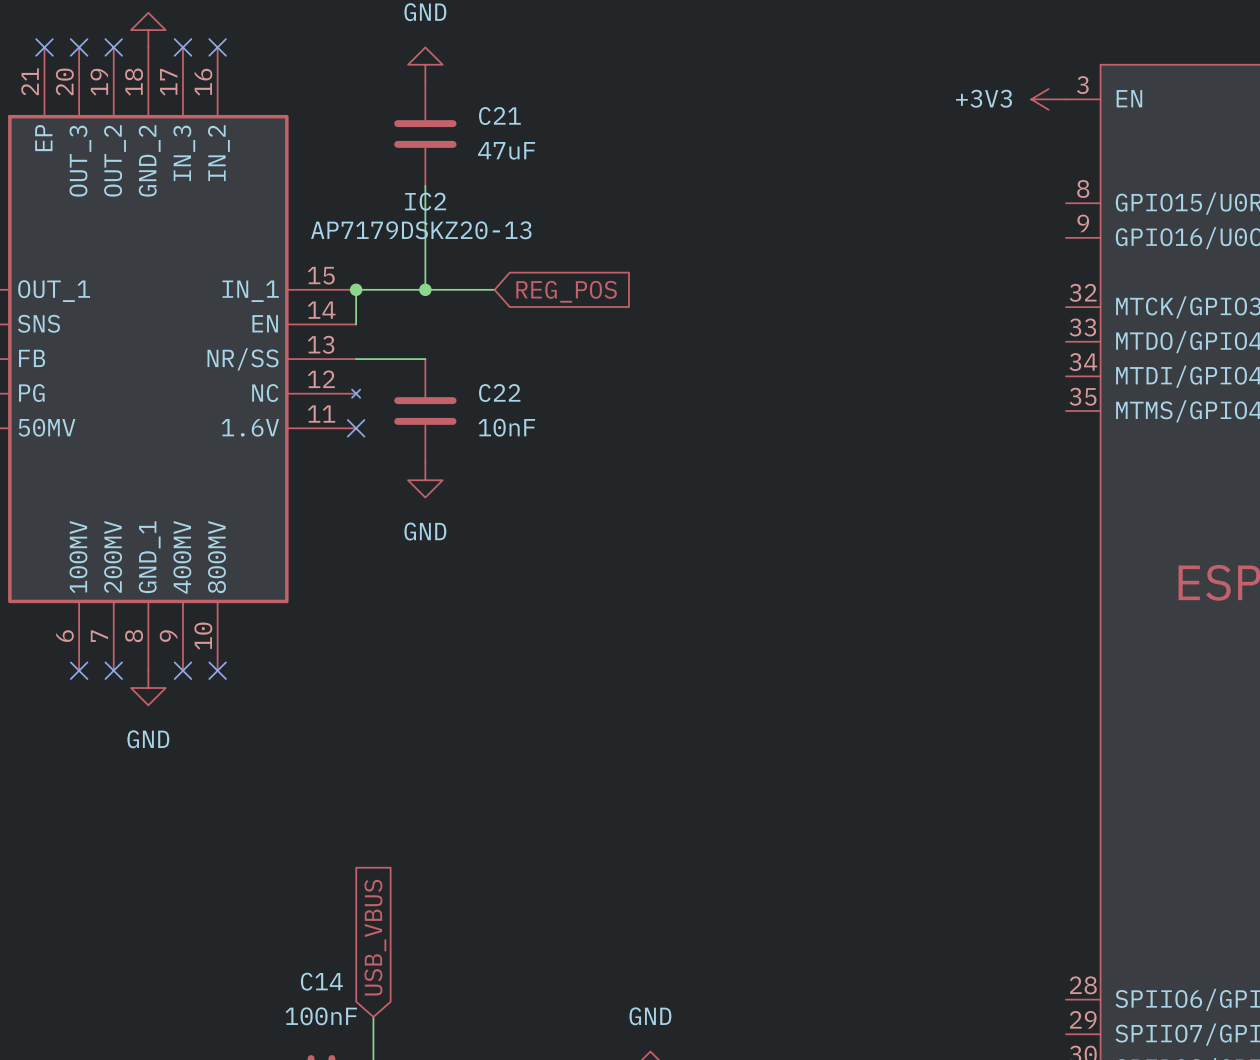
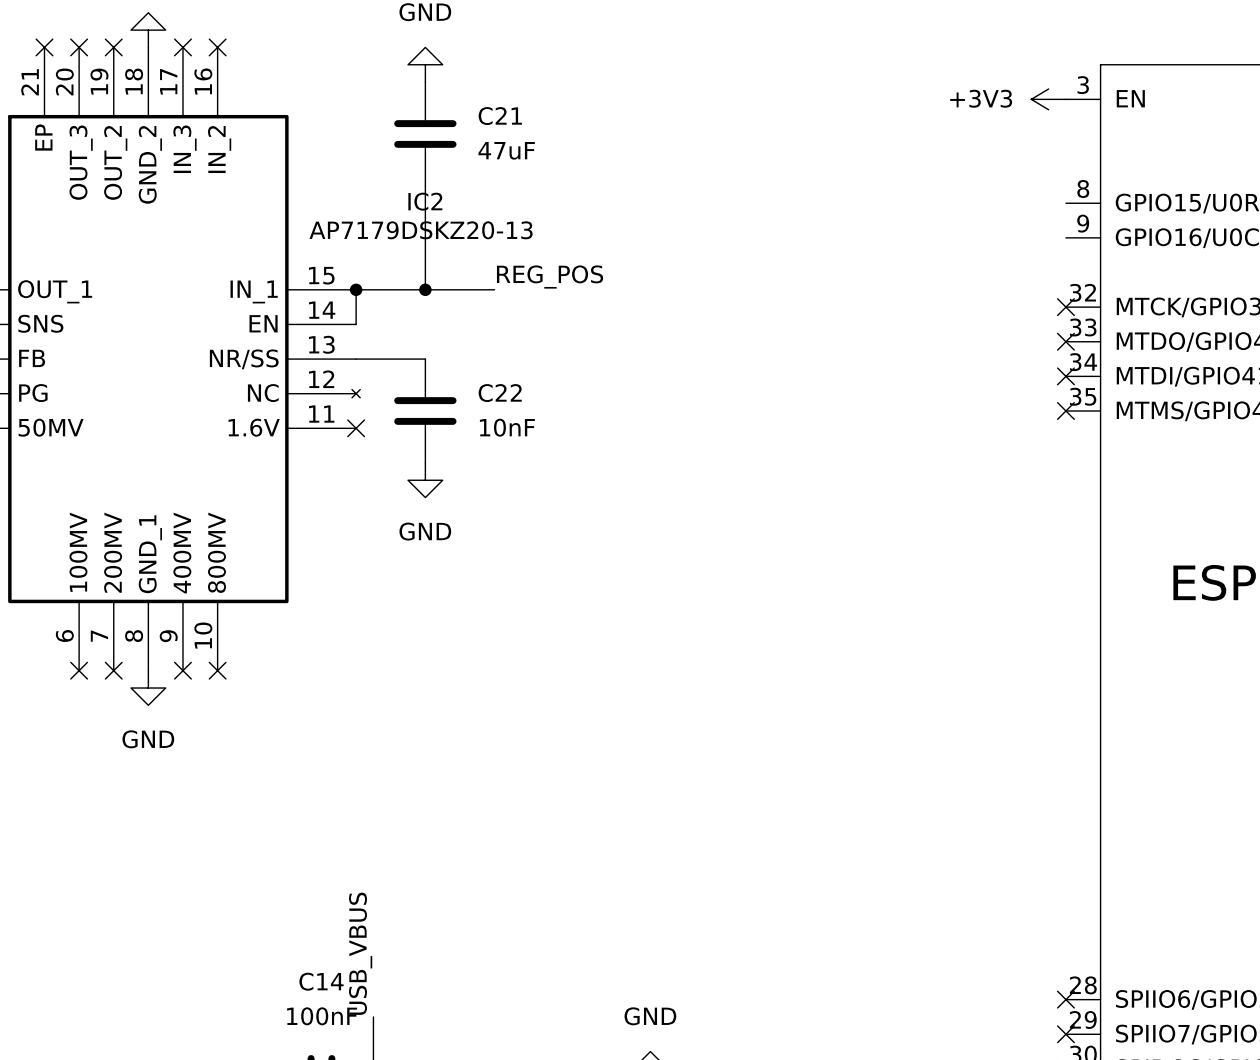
label: none -> REG_POS (550, 277)
global label: REG_POS (566, 291) -> none
no-connect mark: none -> (1065, 307)
no-connect mark: none -> (1065, 341)
no-connect mark: none -> (1065, 376)
no-connect mark: none -> (1065, 411)
global label: USB_VBUS (375, 937) -> none
label: none -> USB_VBUS (360, 953)
no-connect mark: none -> (1065, 999)
no-connect mark: none -> (1065, 1034)

